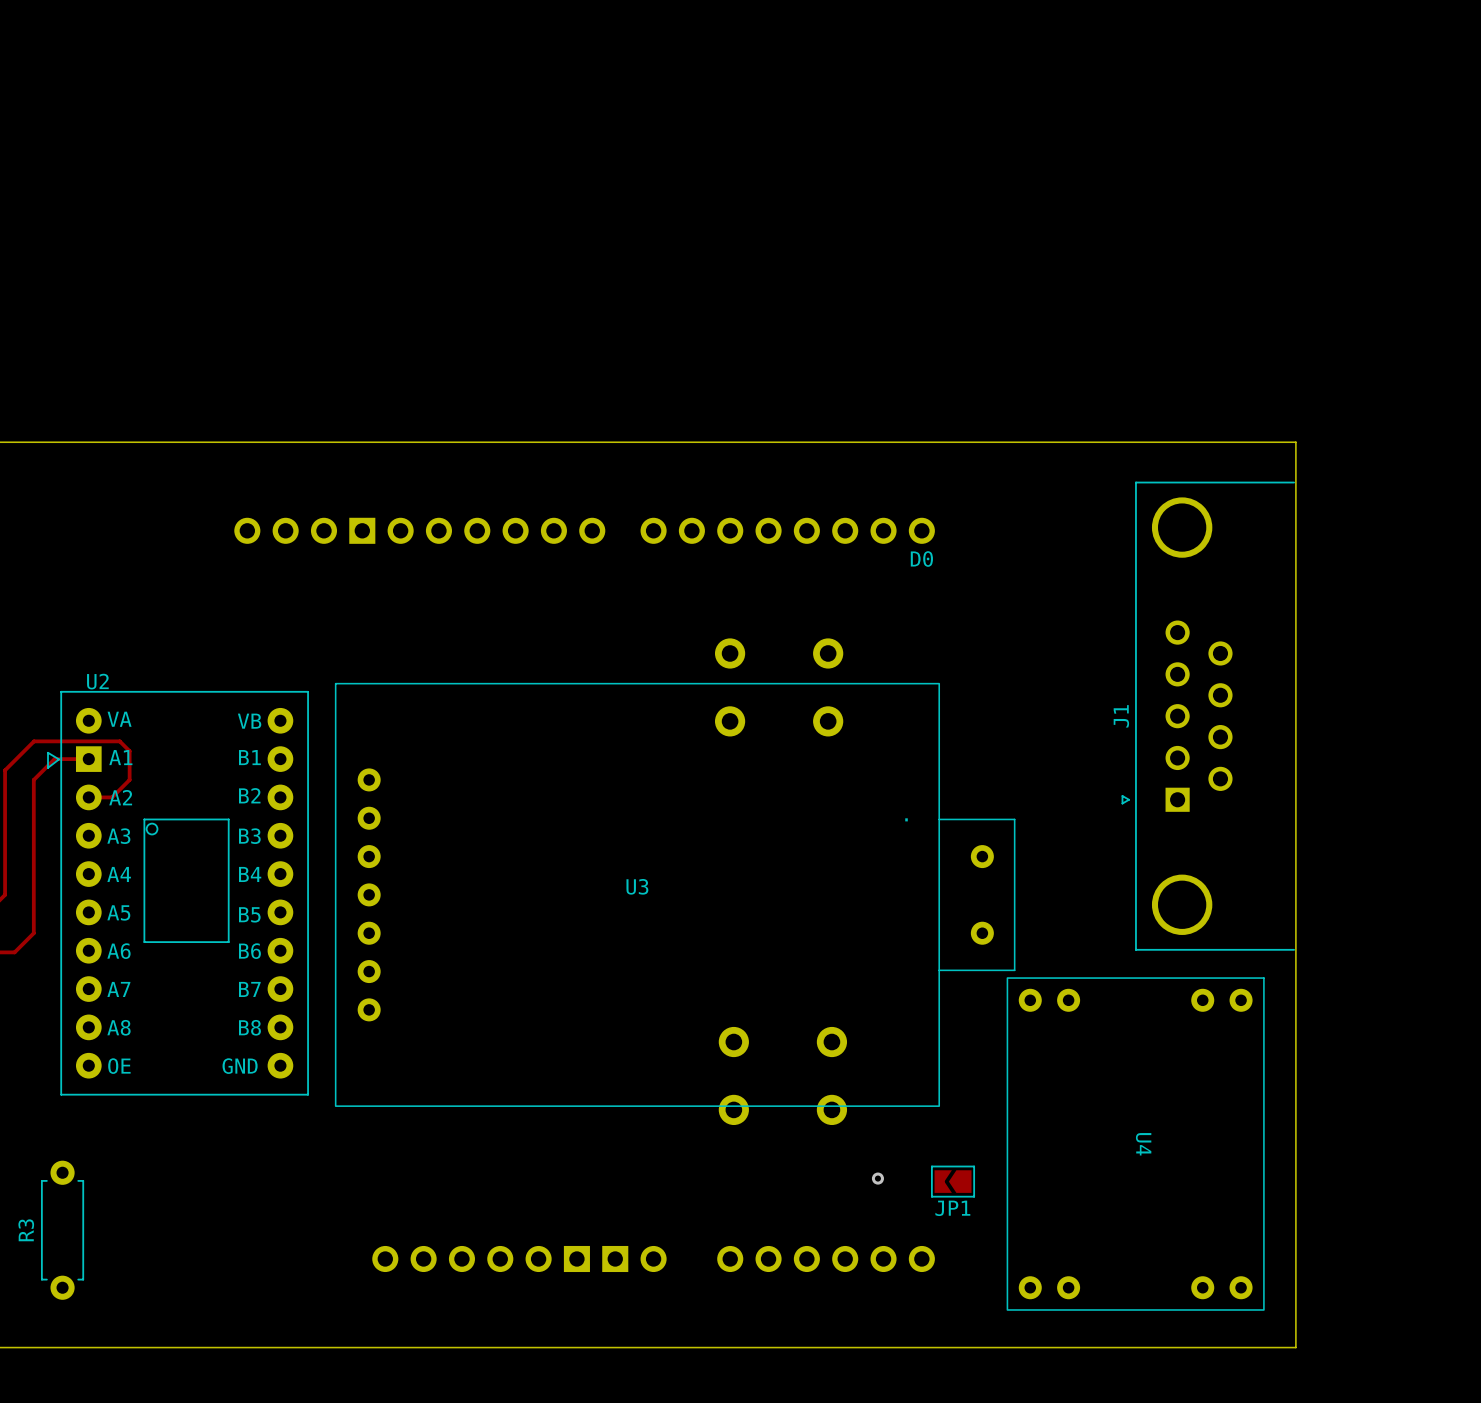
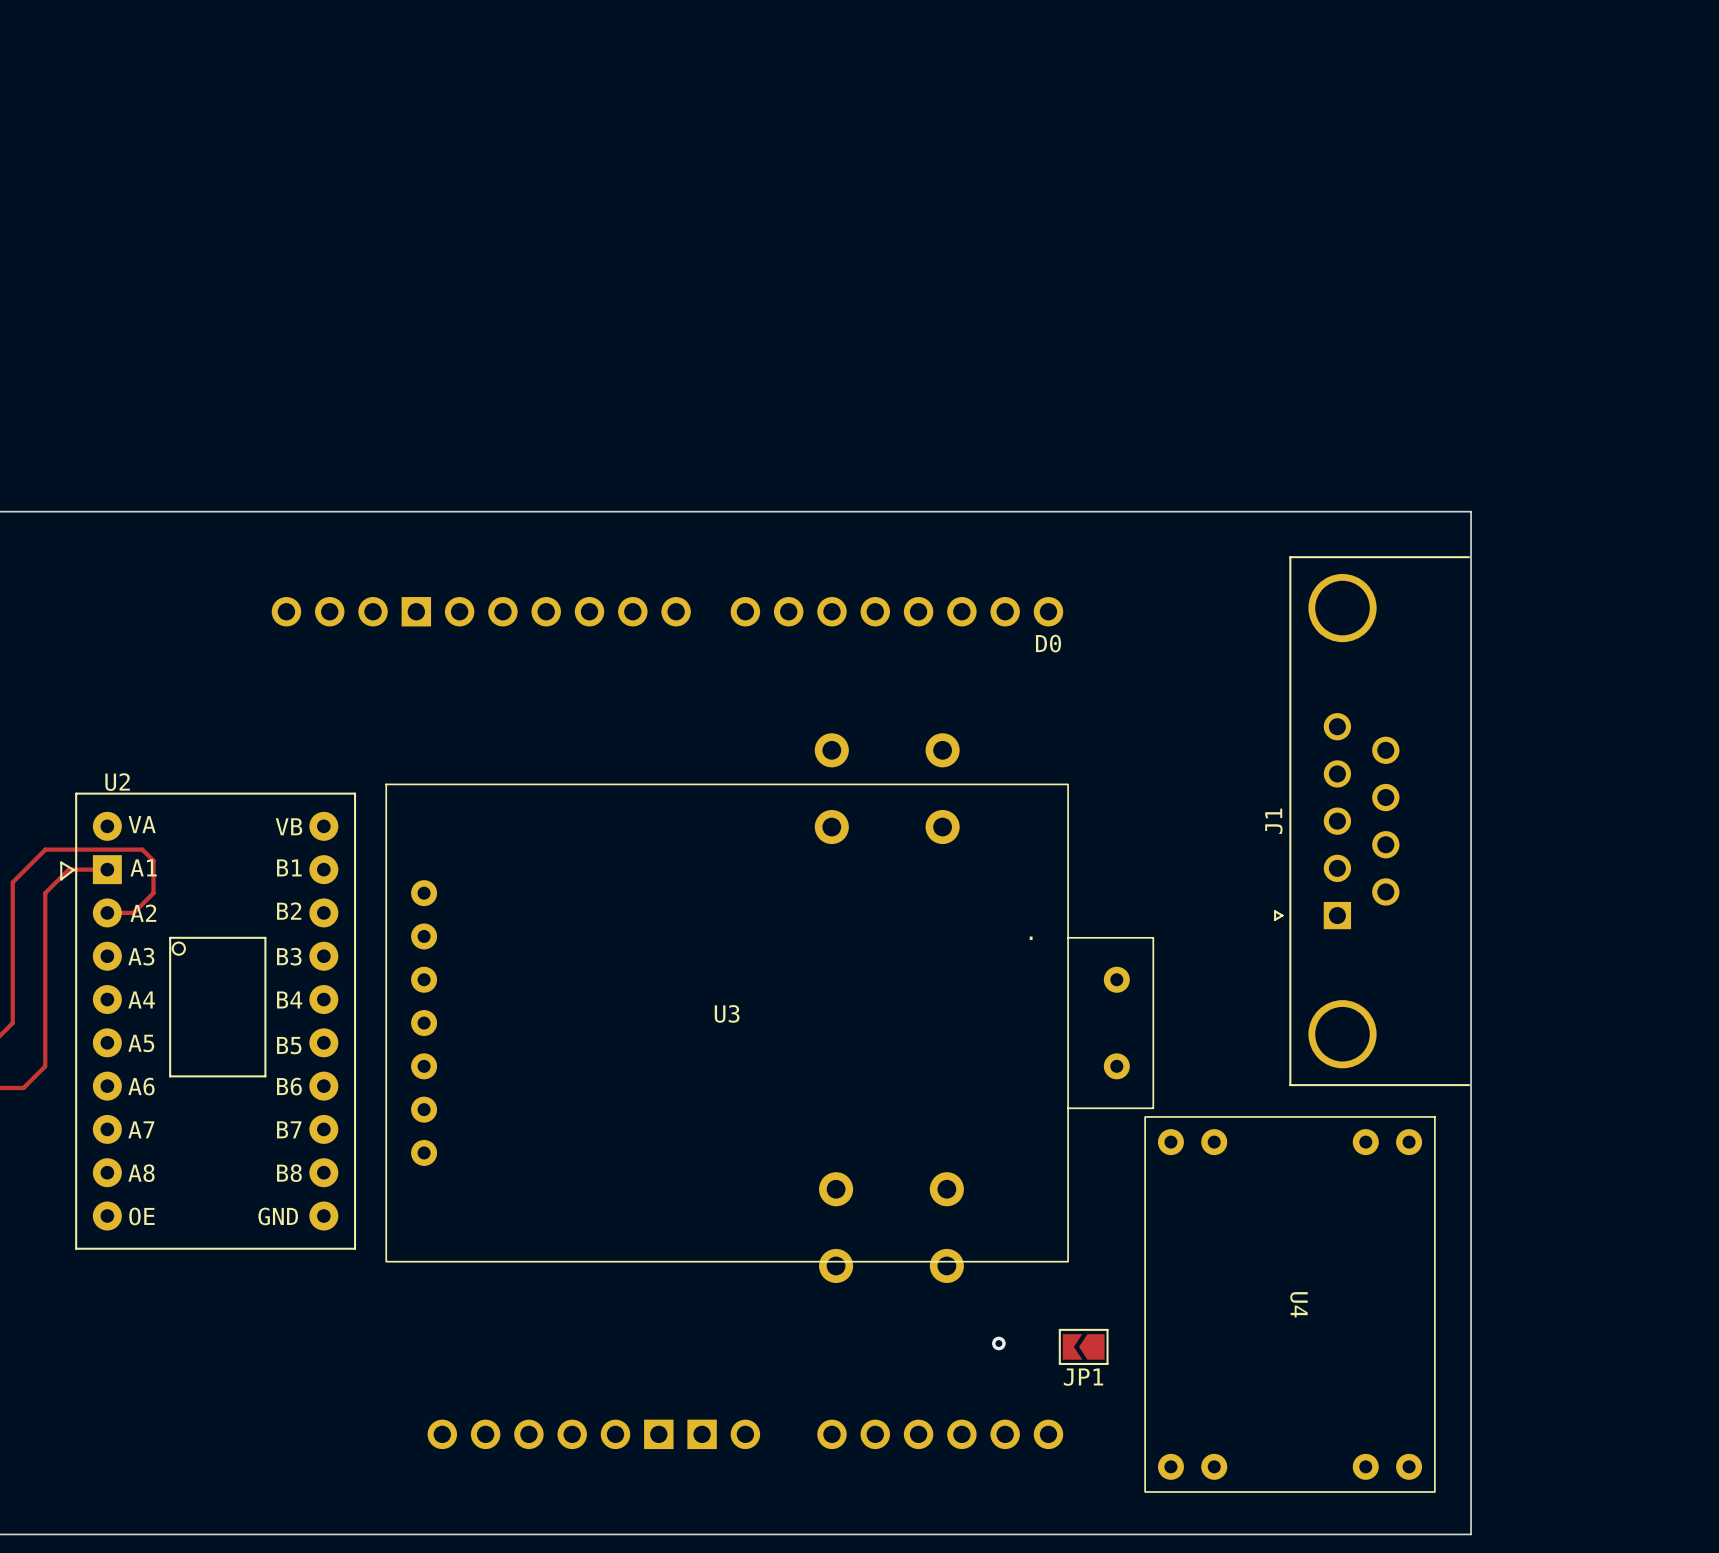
R3: (62, 1230) -> none

